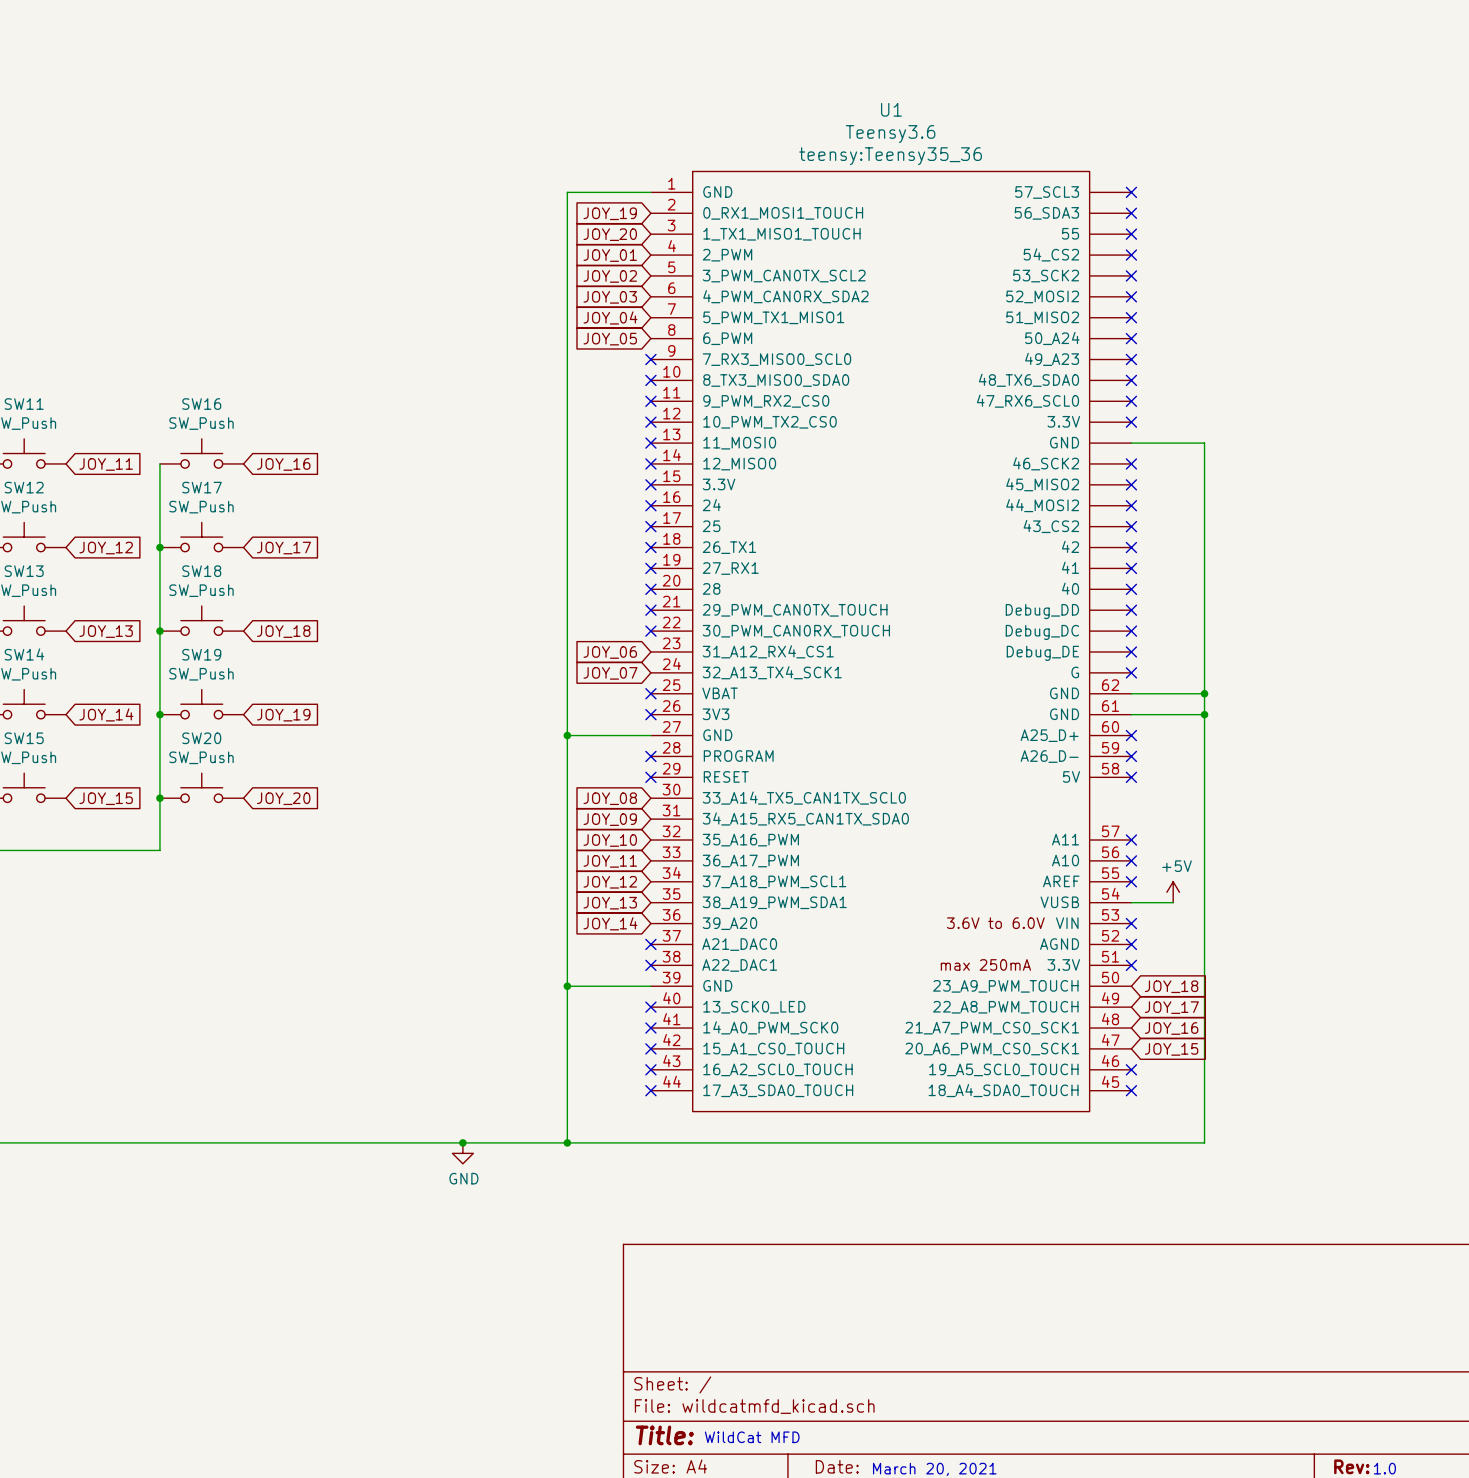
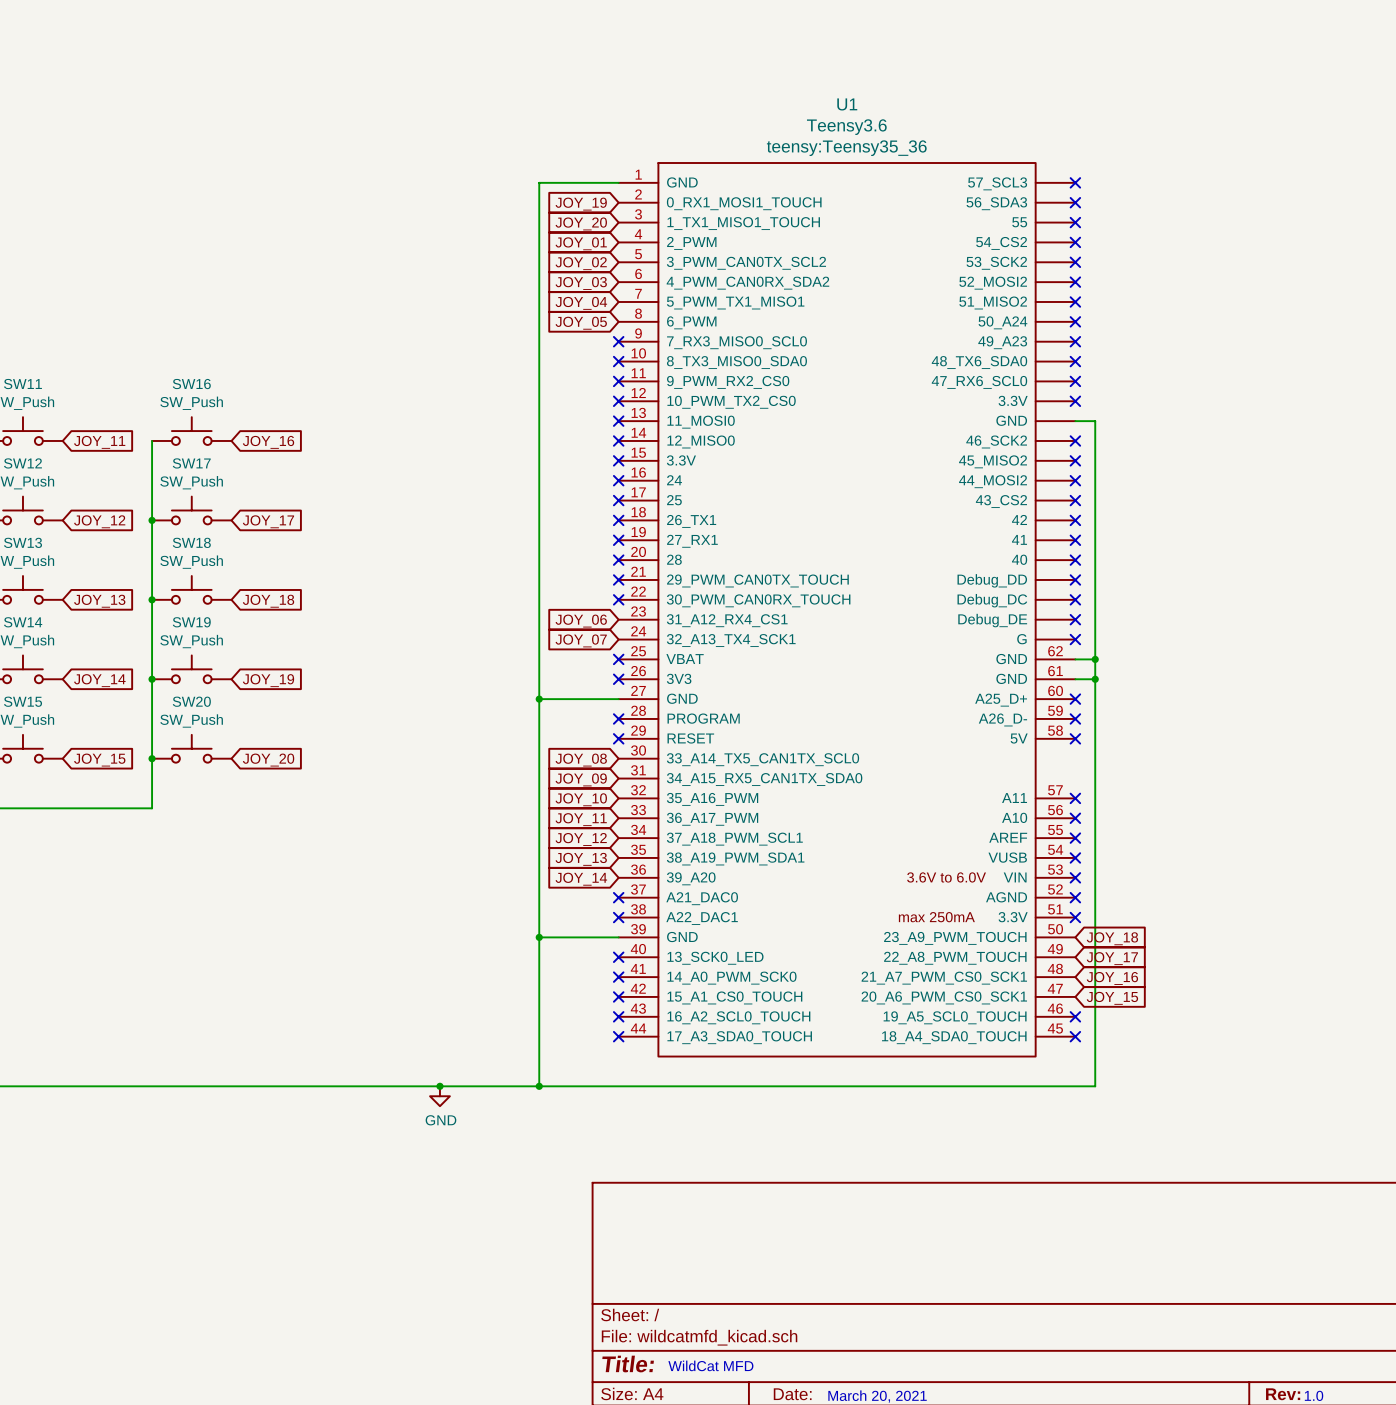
wire: (1152, 443) (1204, 443) (1204, 1142) (1152, 1142) -> (1095, 421) (1095, 1086)
wire: (1152, 693) (1204, 693) -> none
junction: none -> (1095, 659)
junction: (1204, 693) -> none
wire: (1152, 714) (1204, 714) -> none
junction: none -> (1095, 679)
junction: (1204, 714) -> none
power symbol: +5V (1173, 892) -> none
wire: (1131, 902) (1173, 902) -> none
no-connect mark: none -> (1075, 857)

